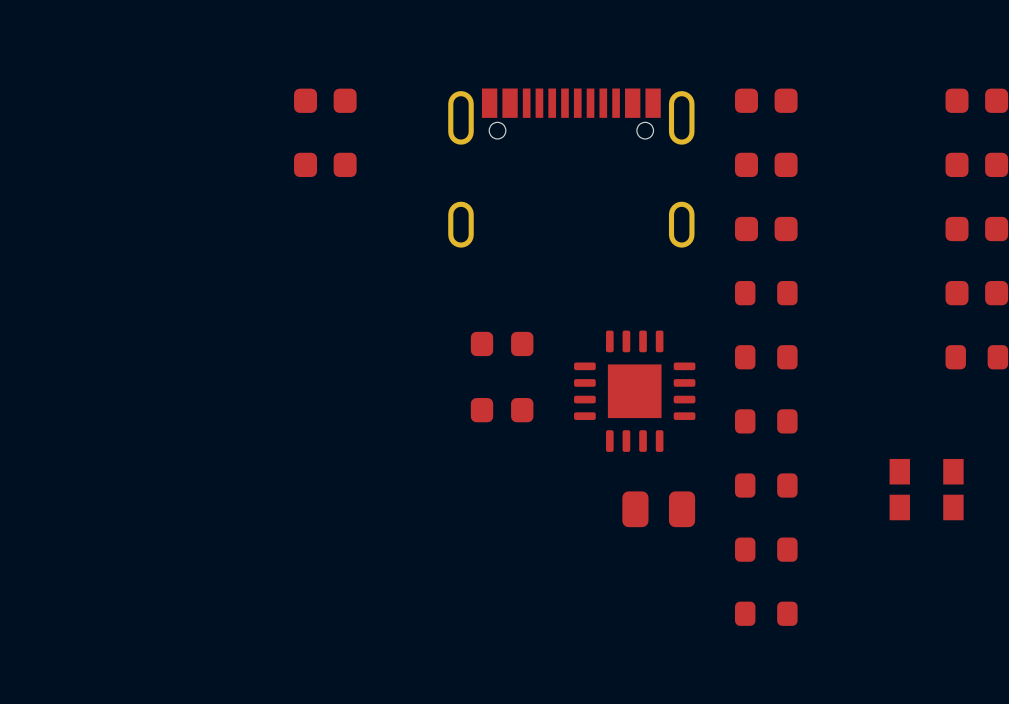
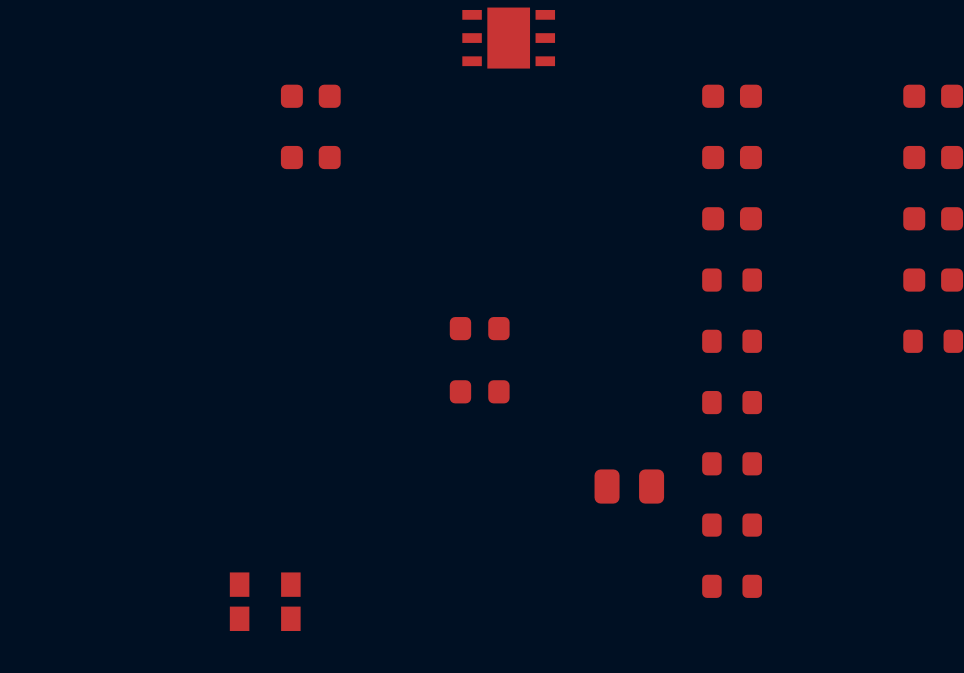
part: none -> (508, 38)
part: (571, 168) -> none
part: (634, 391) -> none
part: (926, 489) -> none
part: none -> (265, 601)

